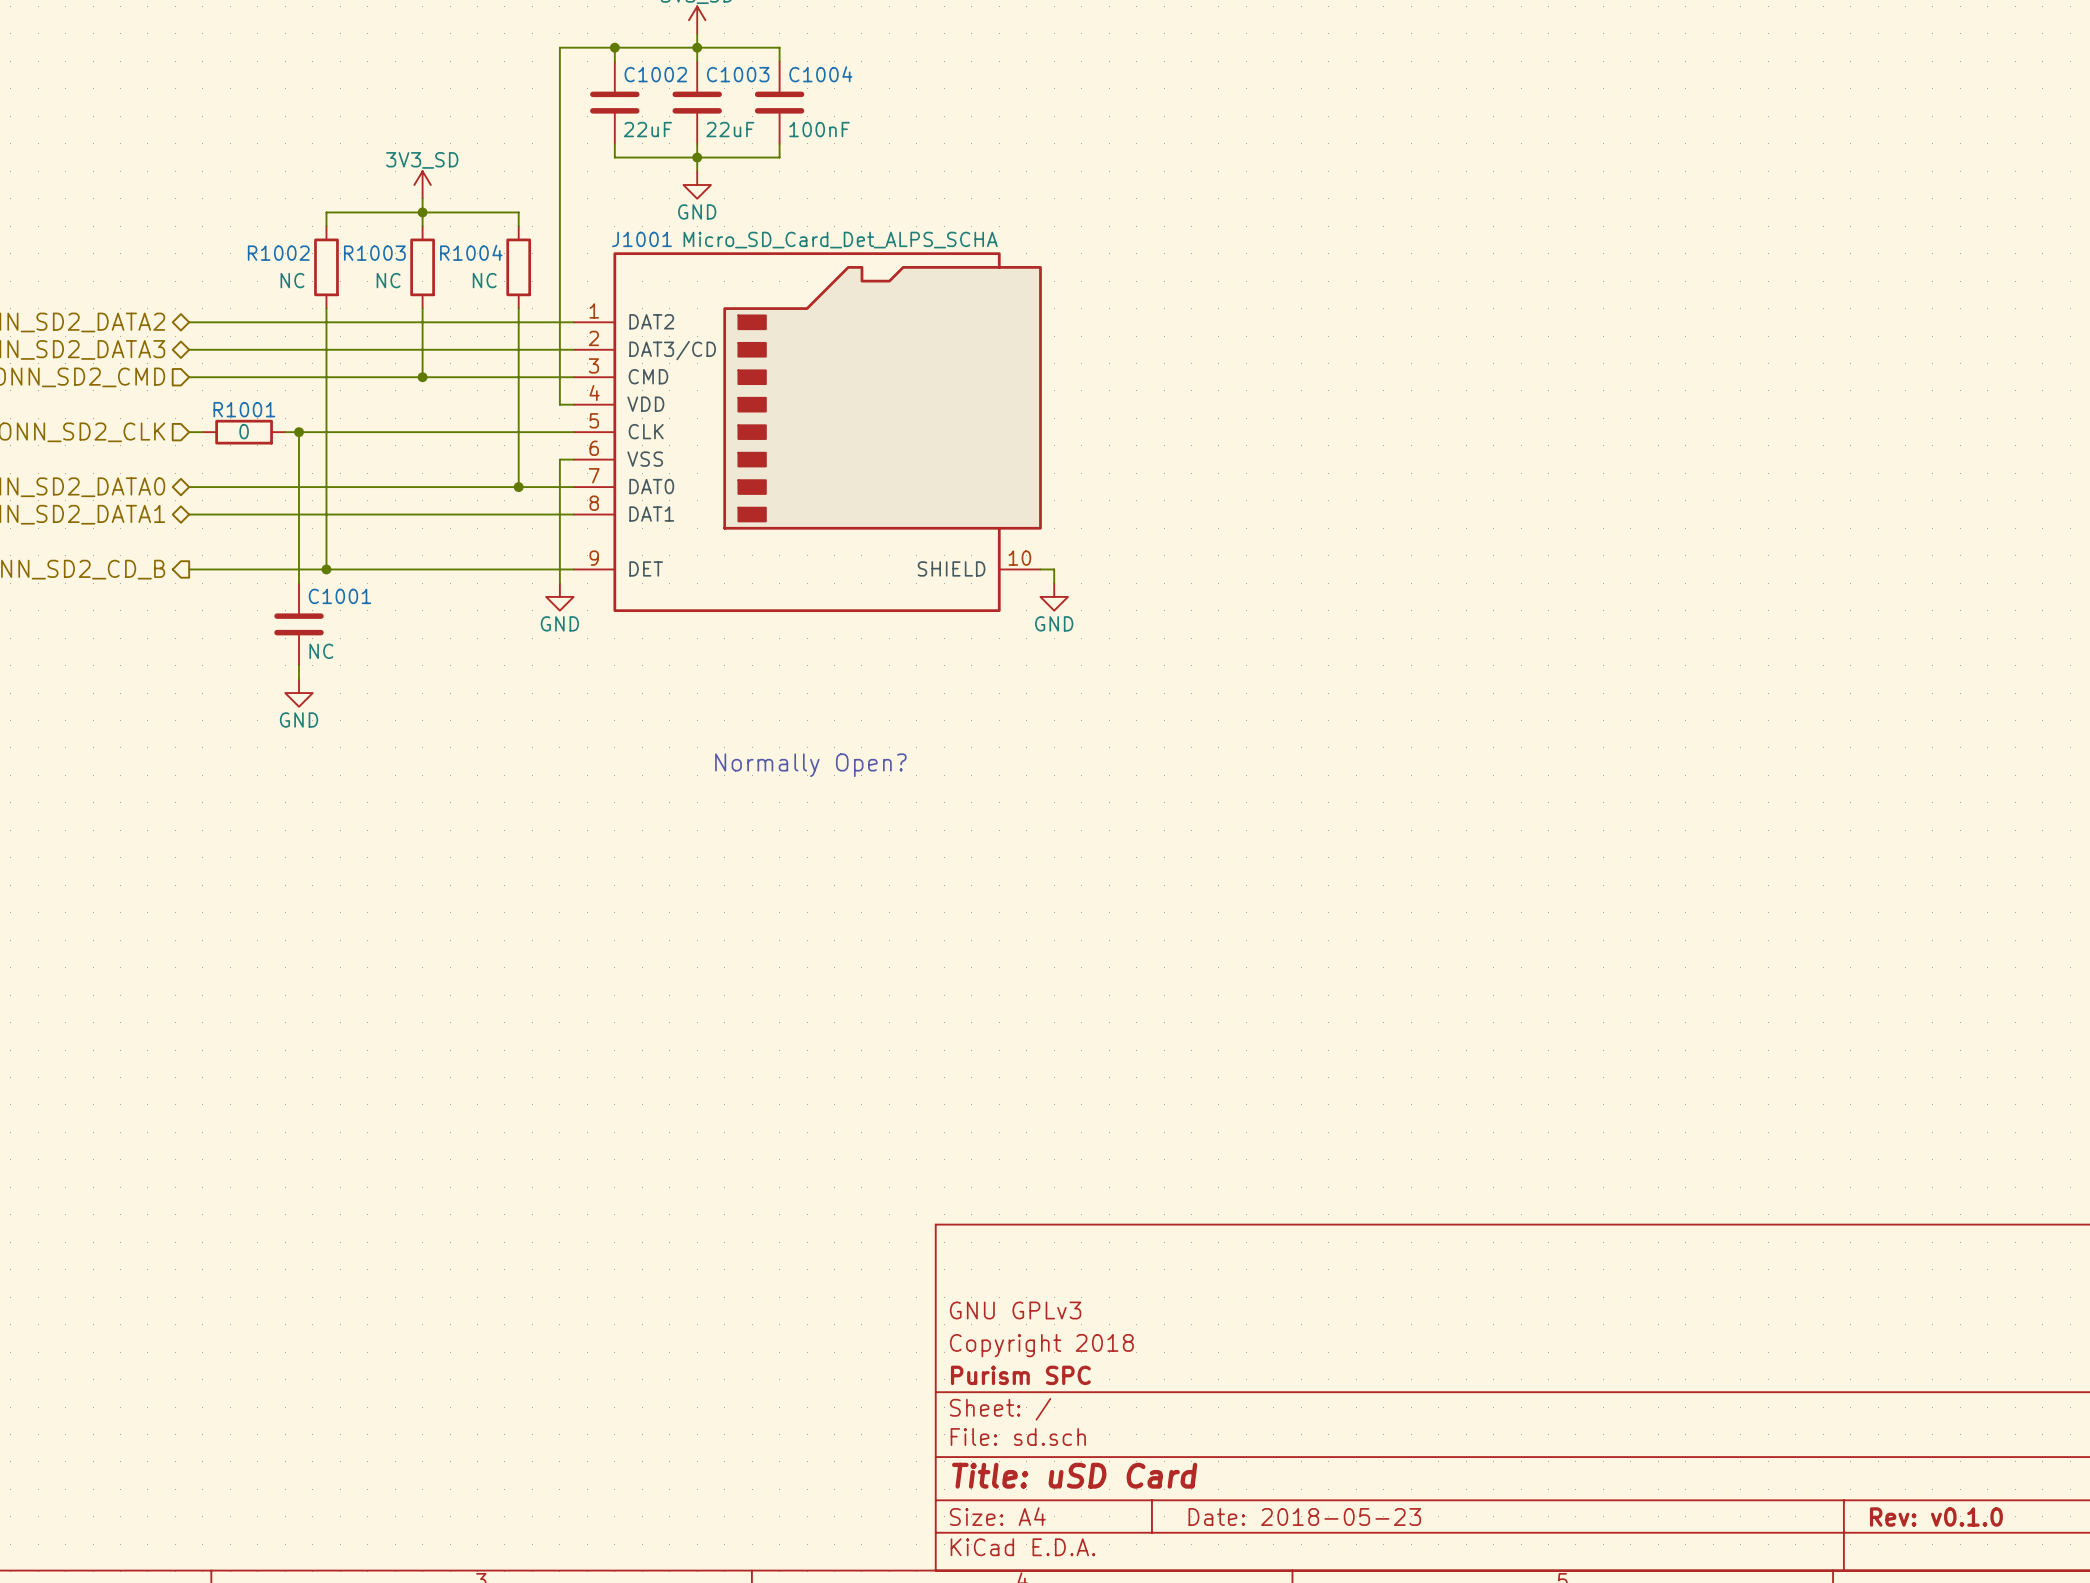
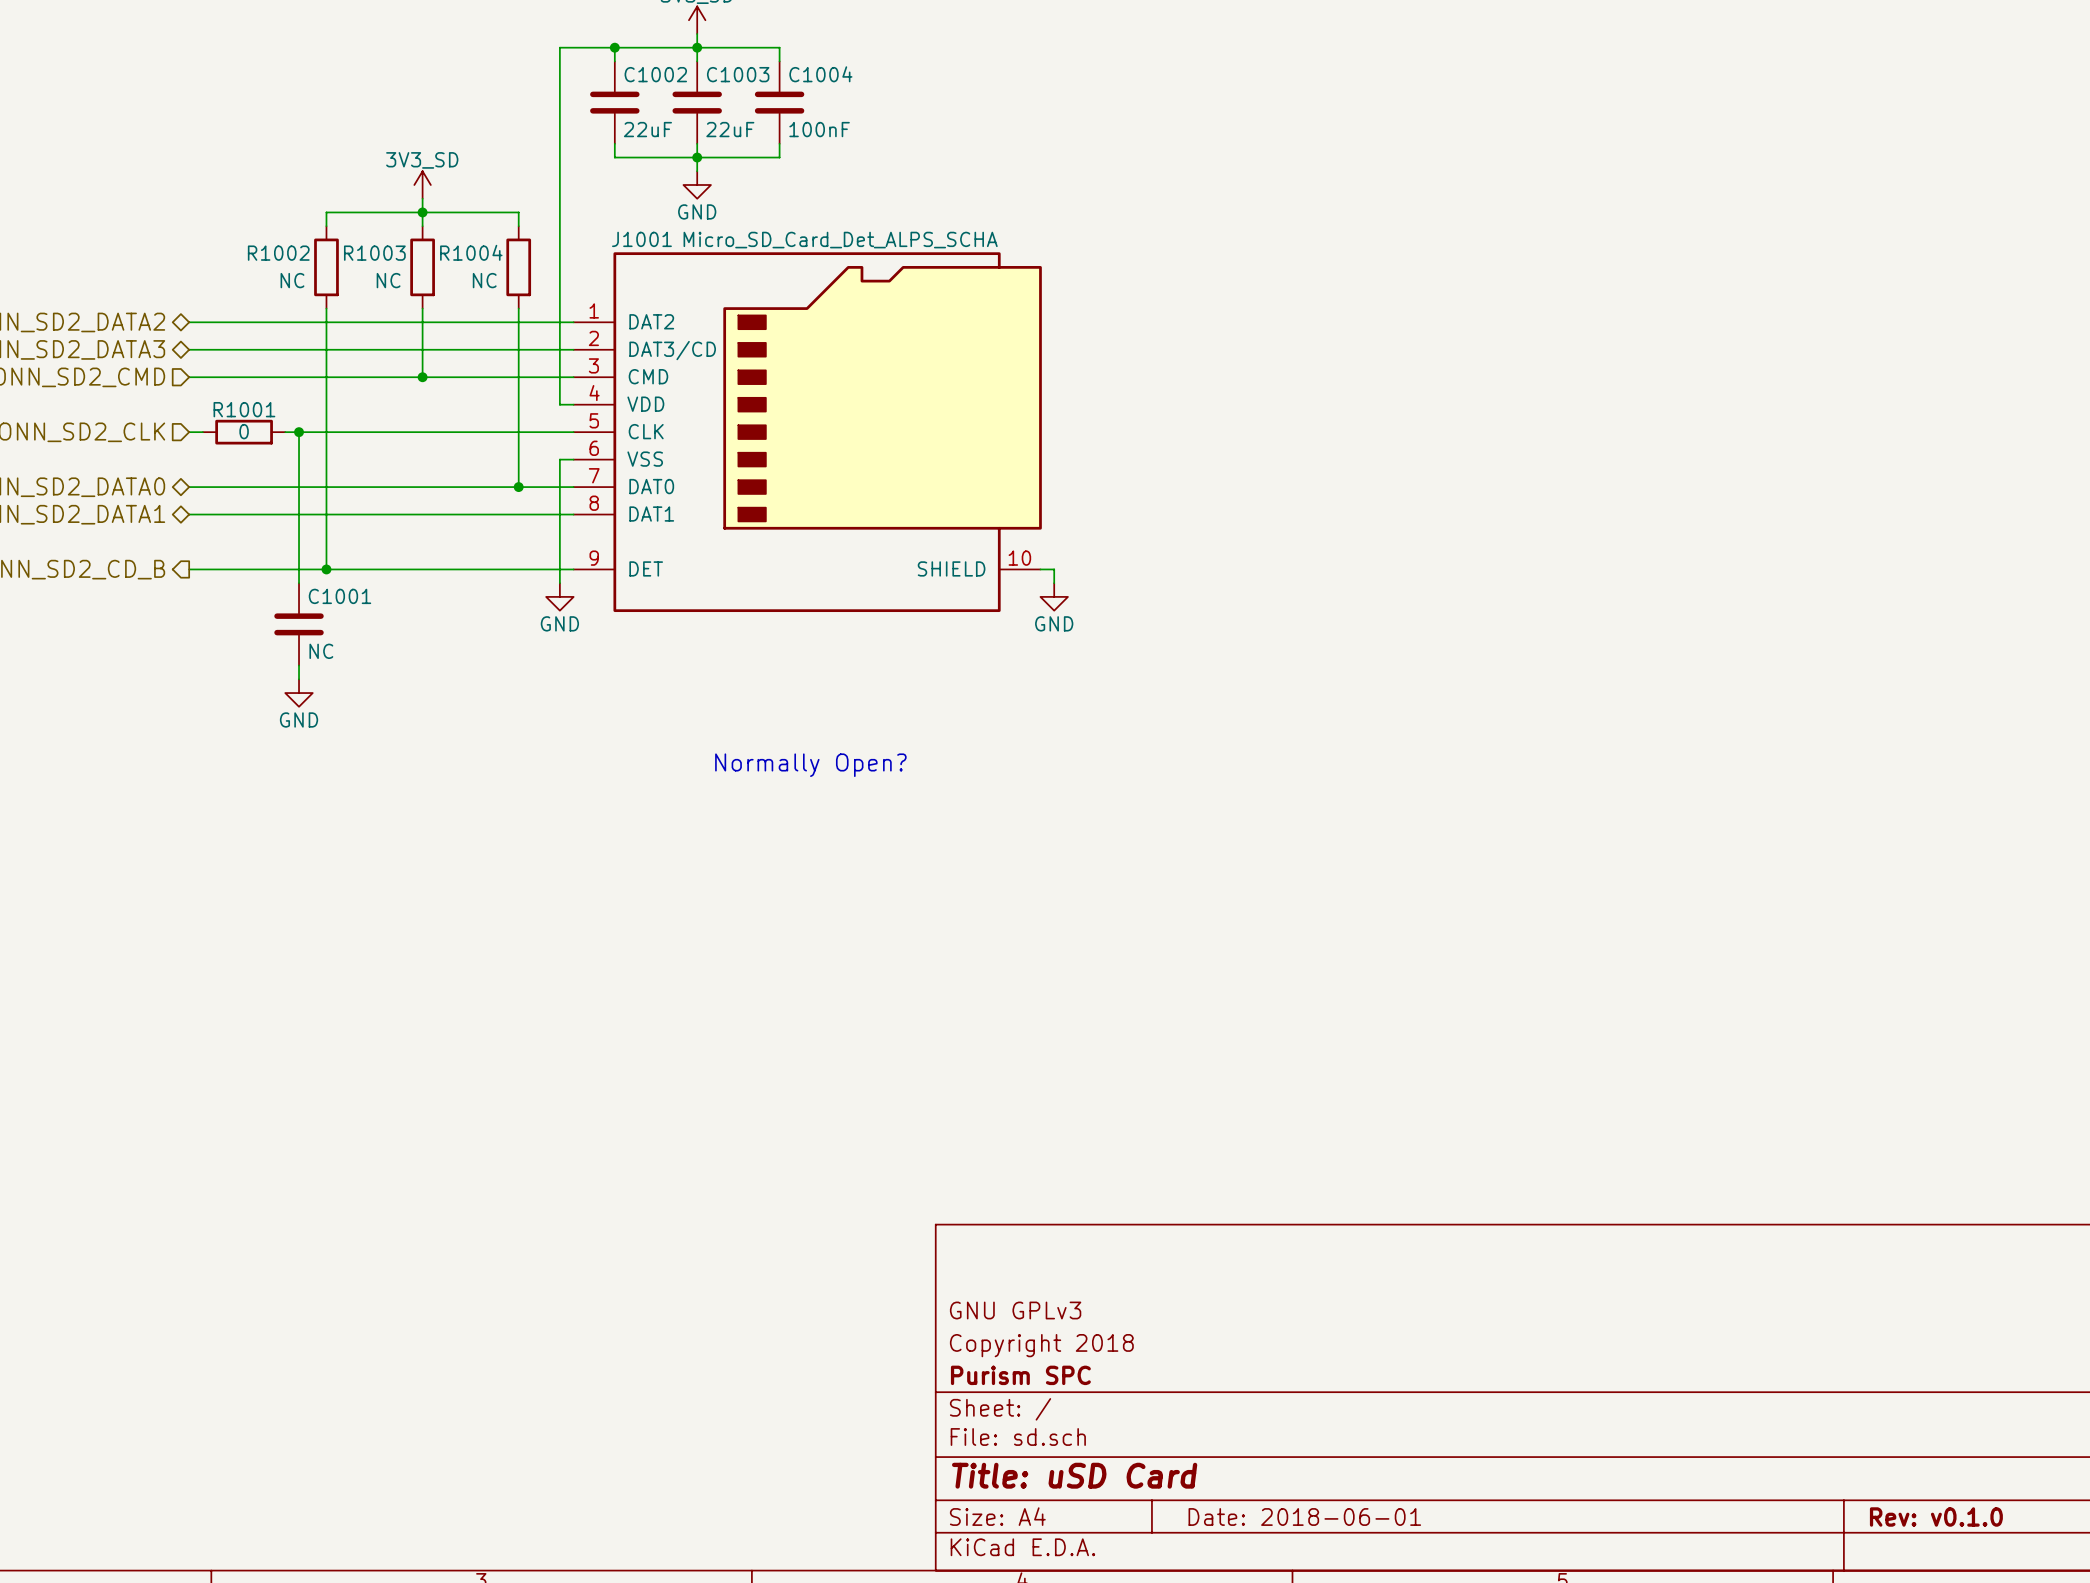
title block: Date: 2018-05-23 (1304, 1517) -> Date: 2018-06-01 (1304, 1517)

